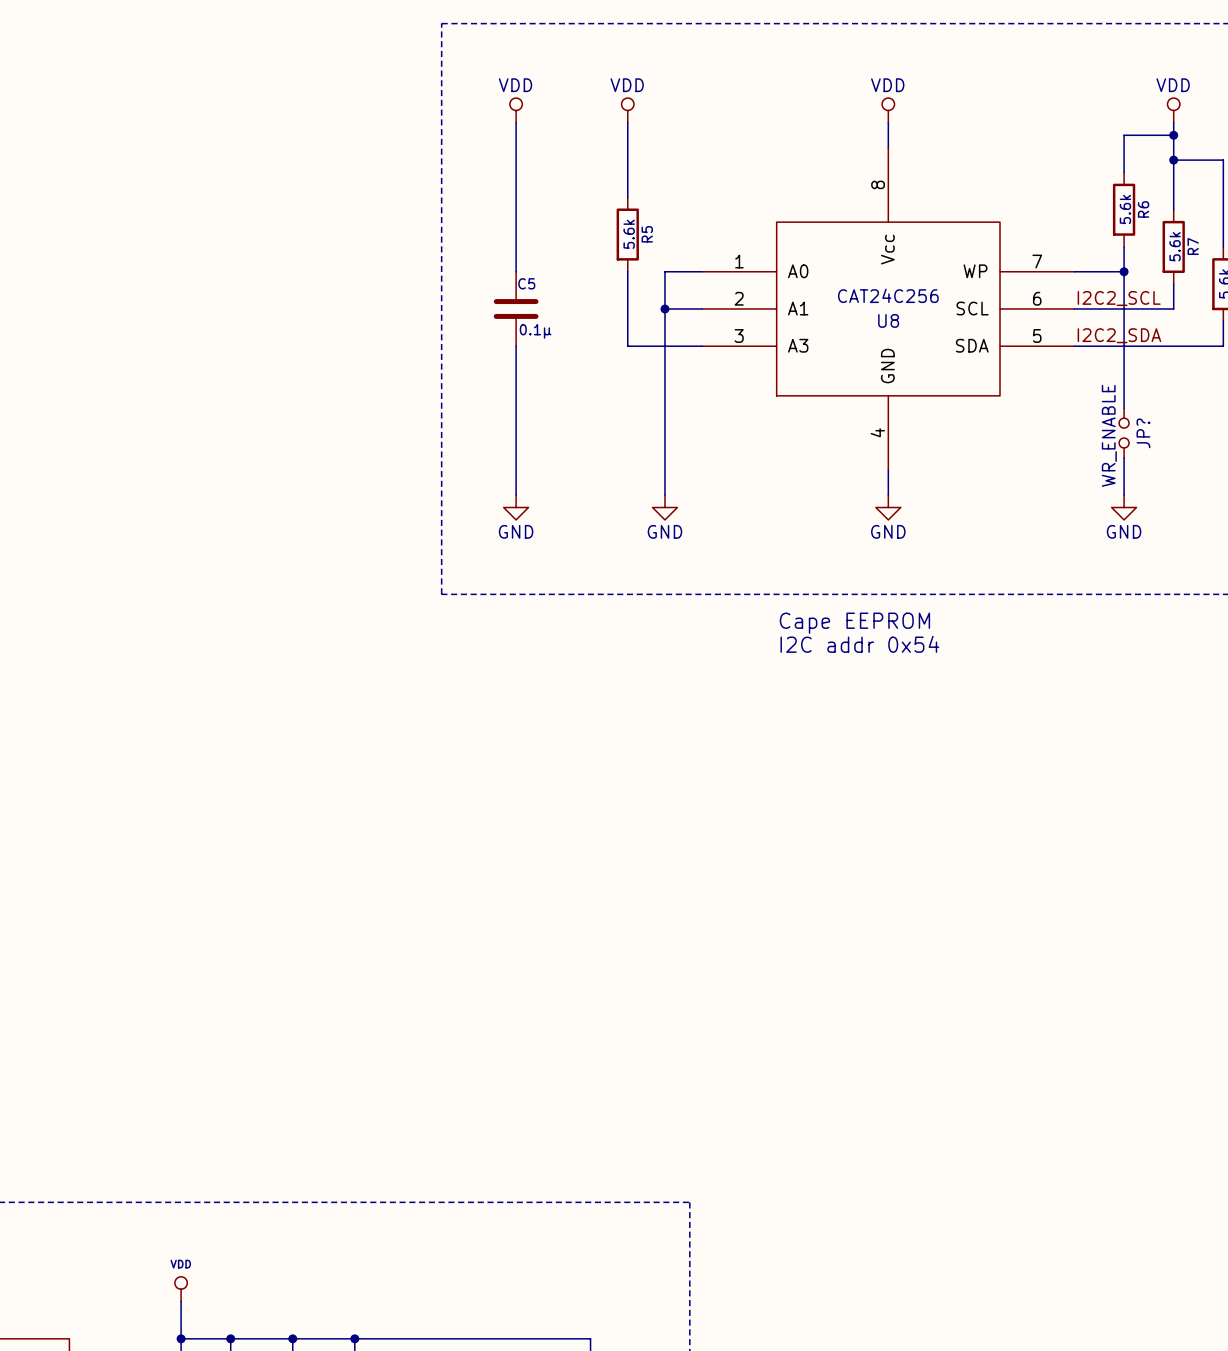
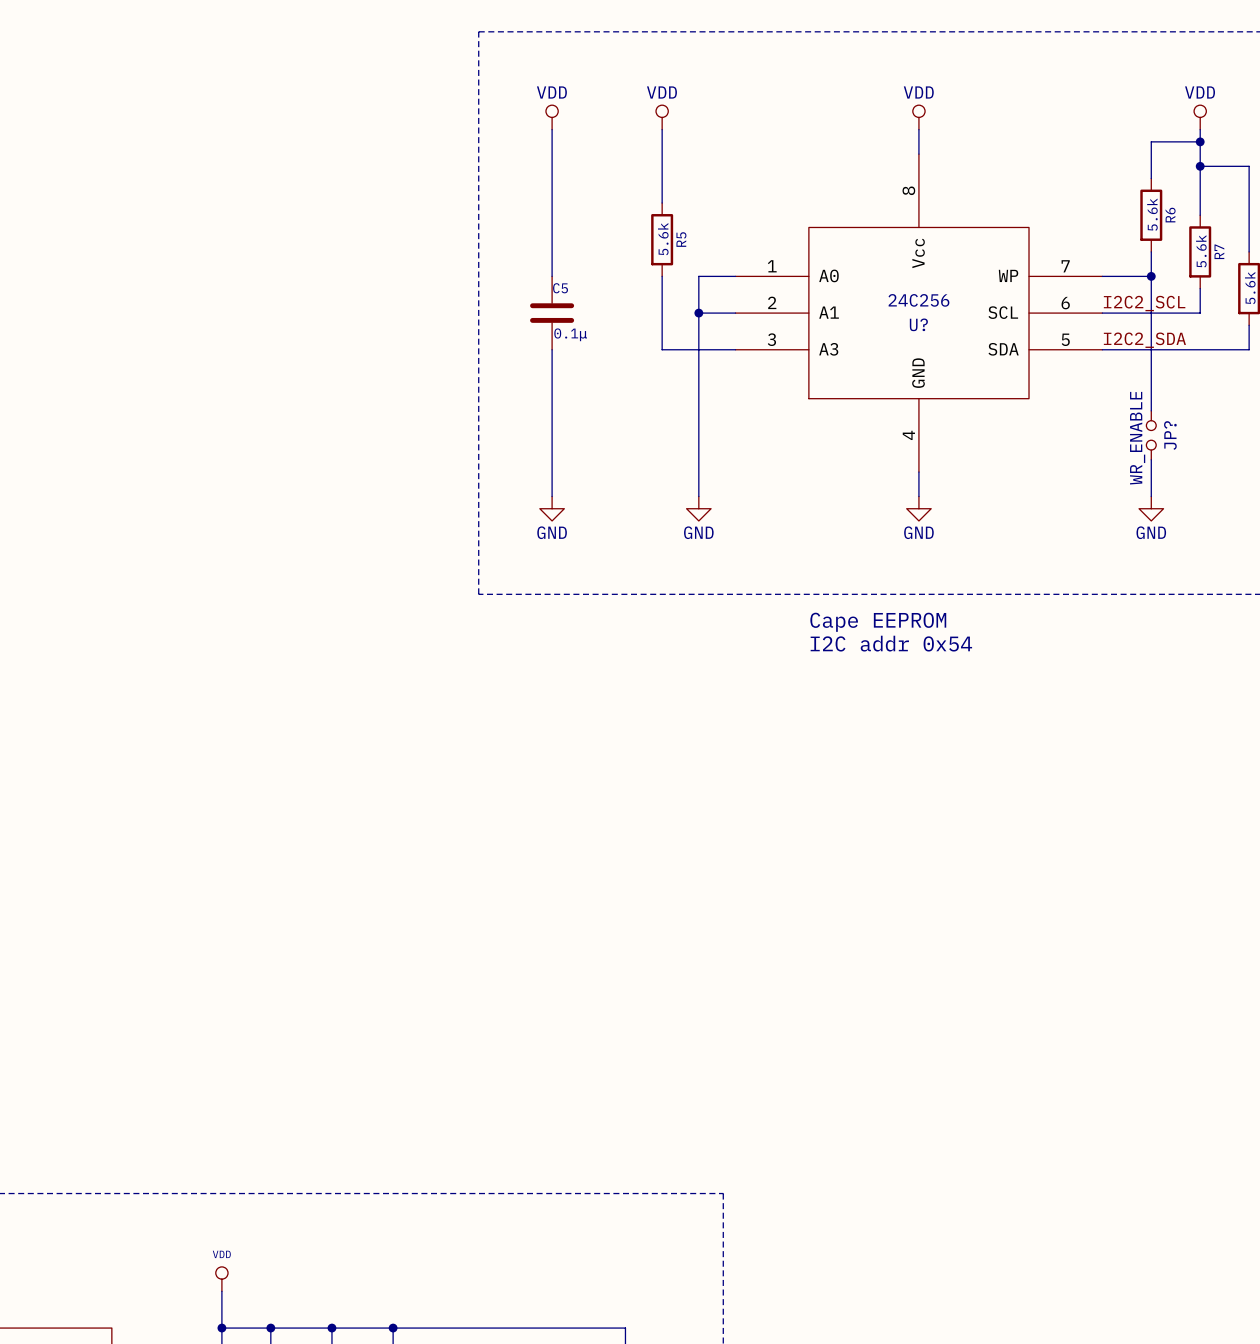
U8 value: CAT24C256 (888, 295) -> 24C256 (918, 300)
U8 name: U8 (888, 320) -> U? (918, 324)

